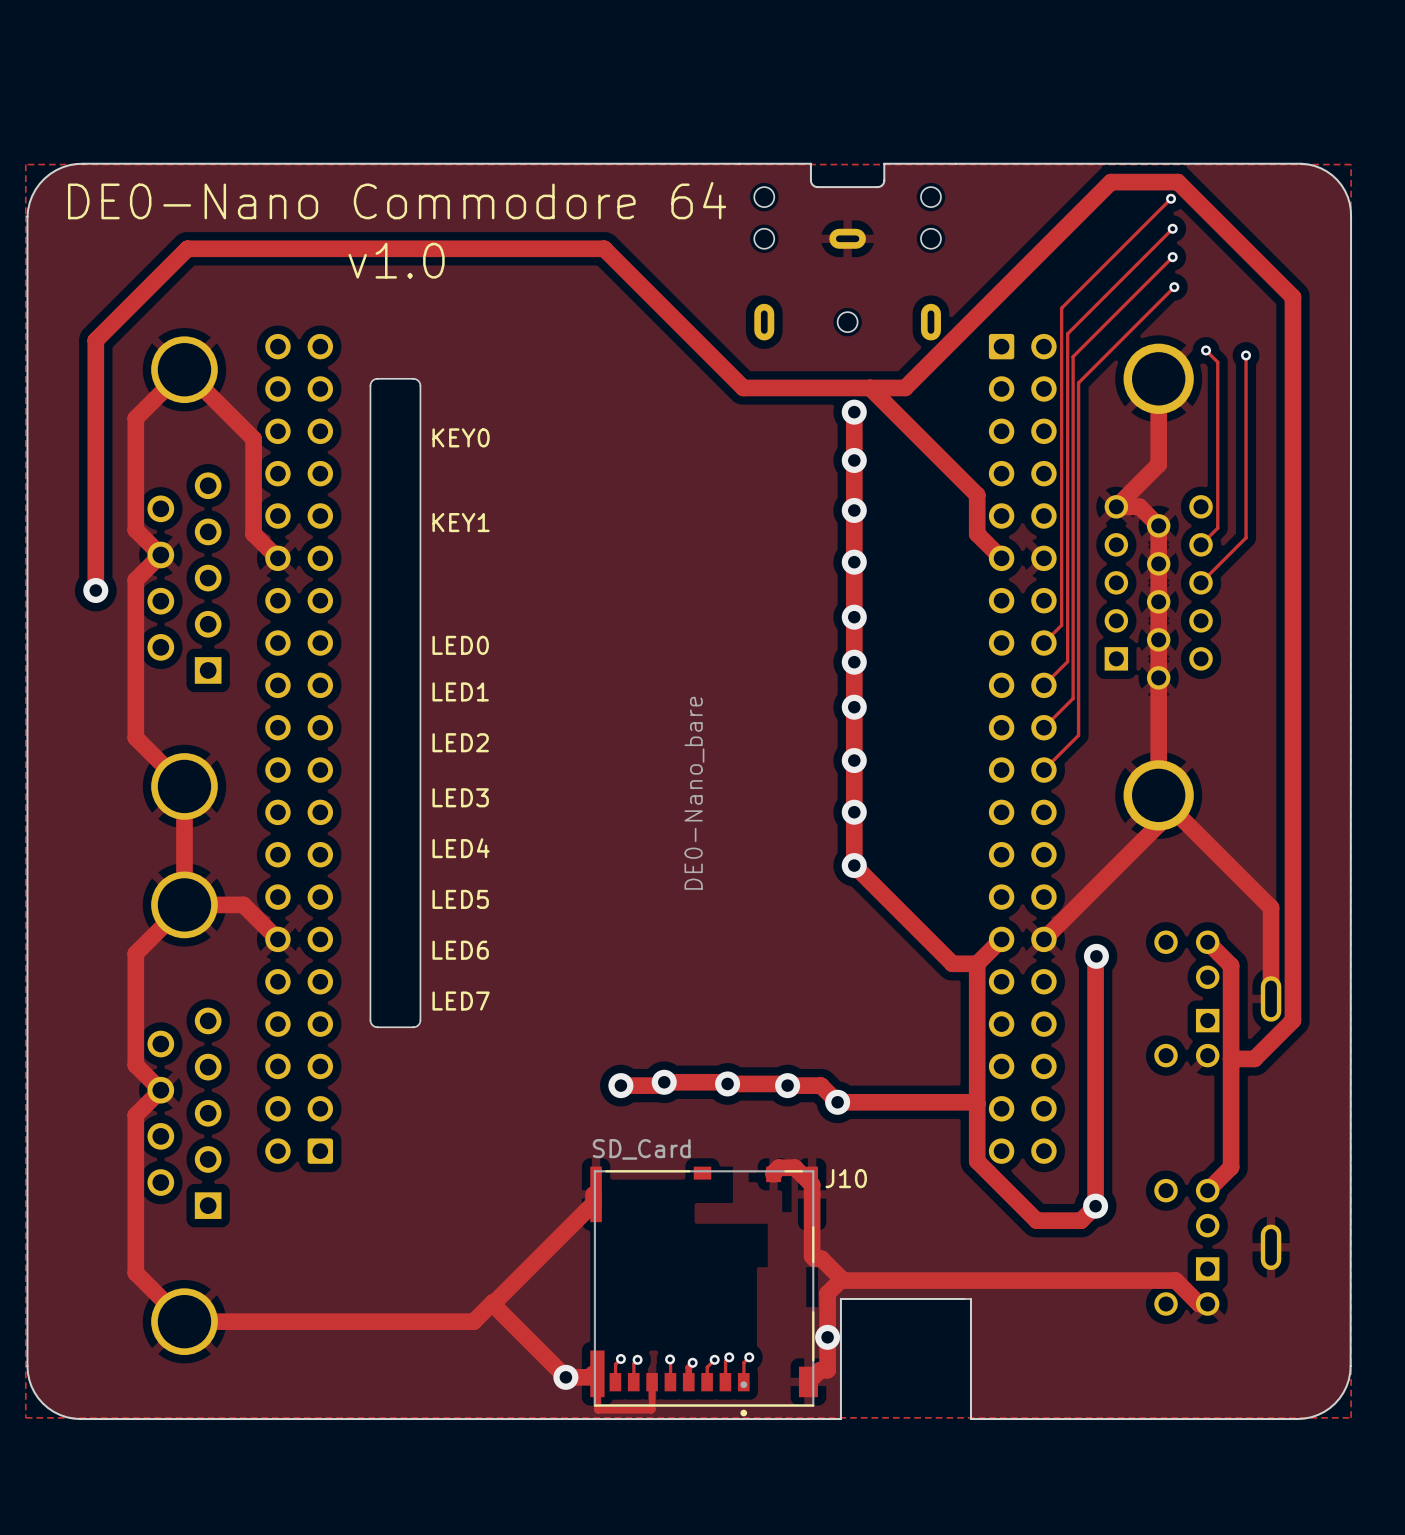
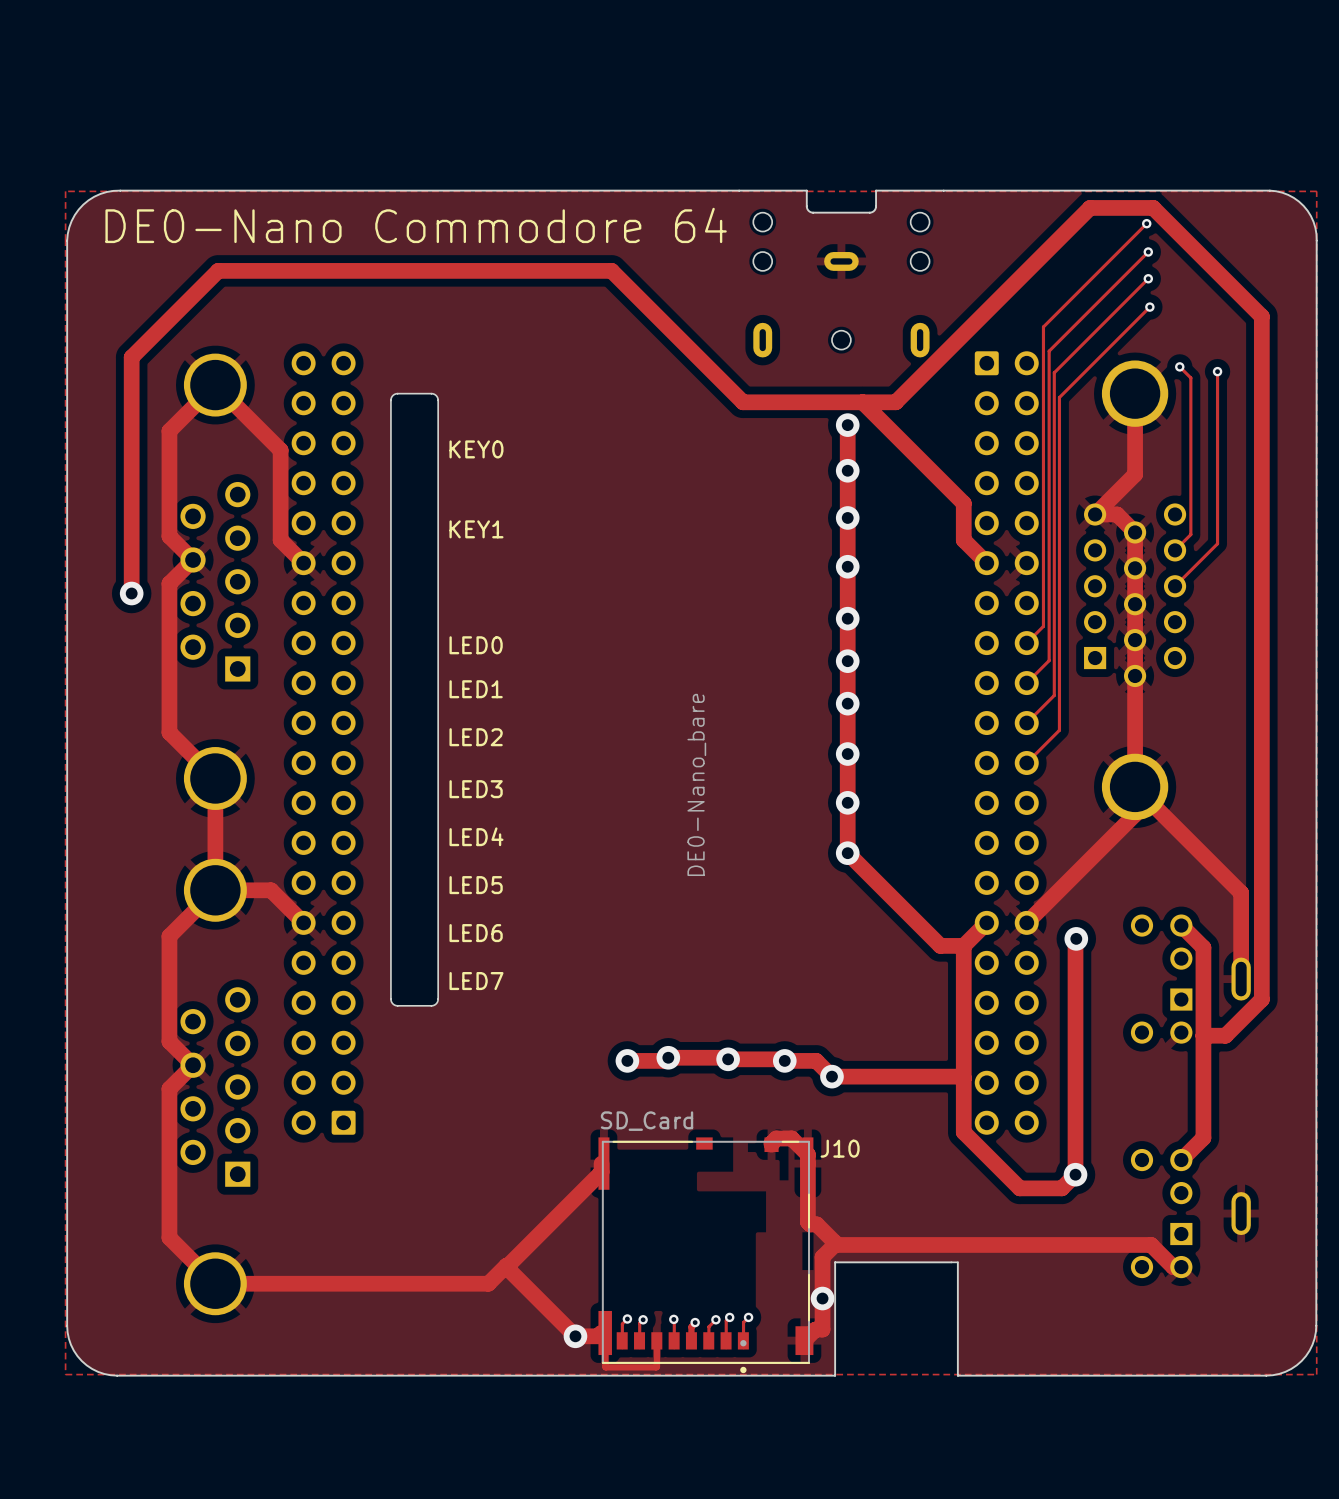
text: v1.0 (396, 260) -> none

